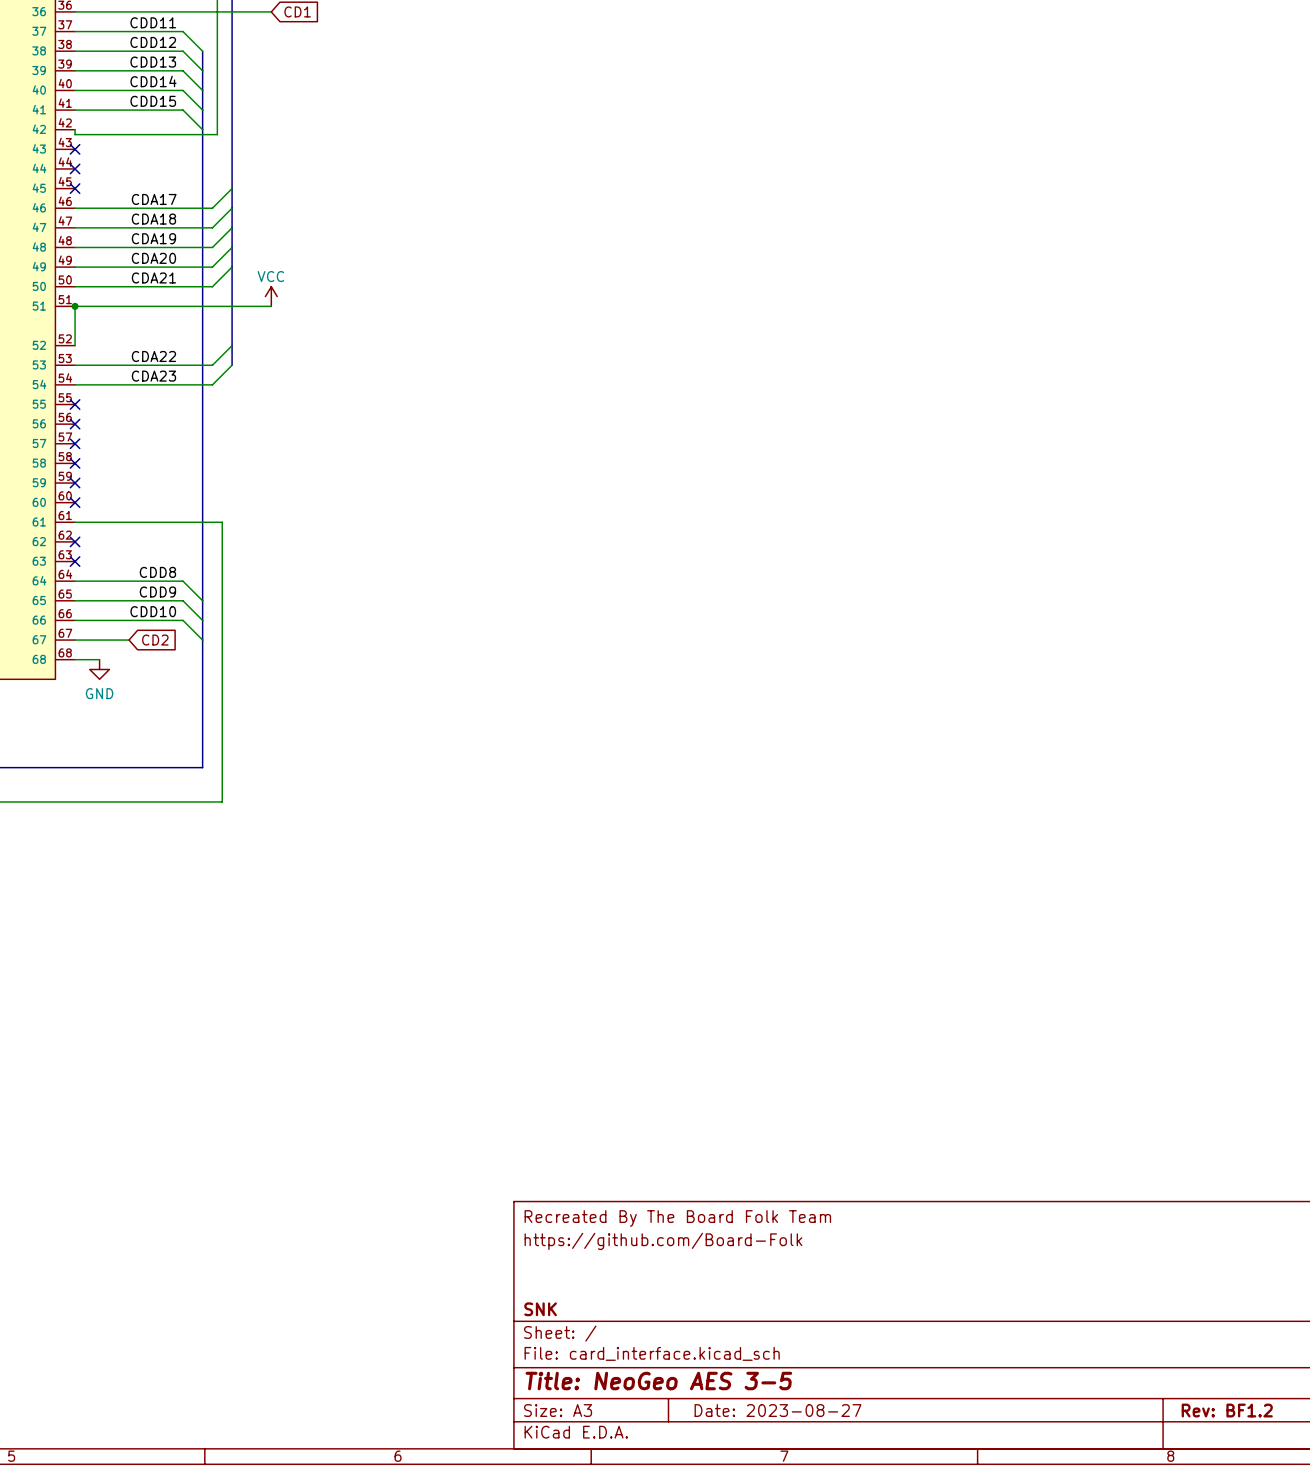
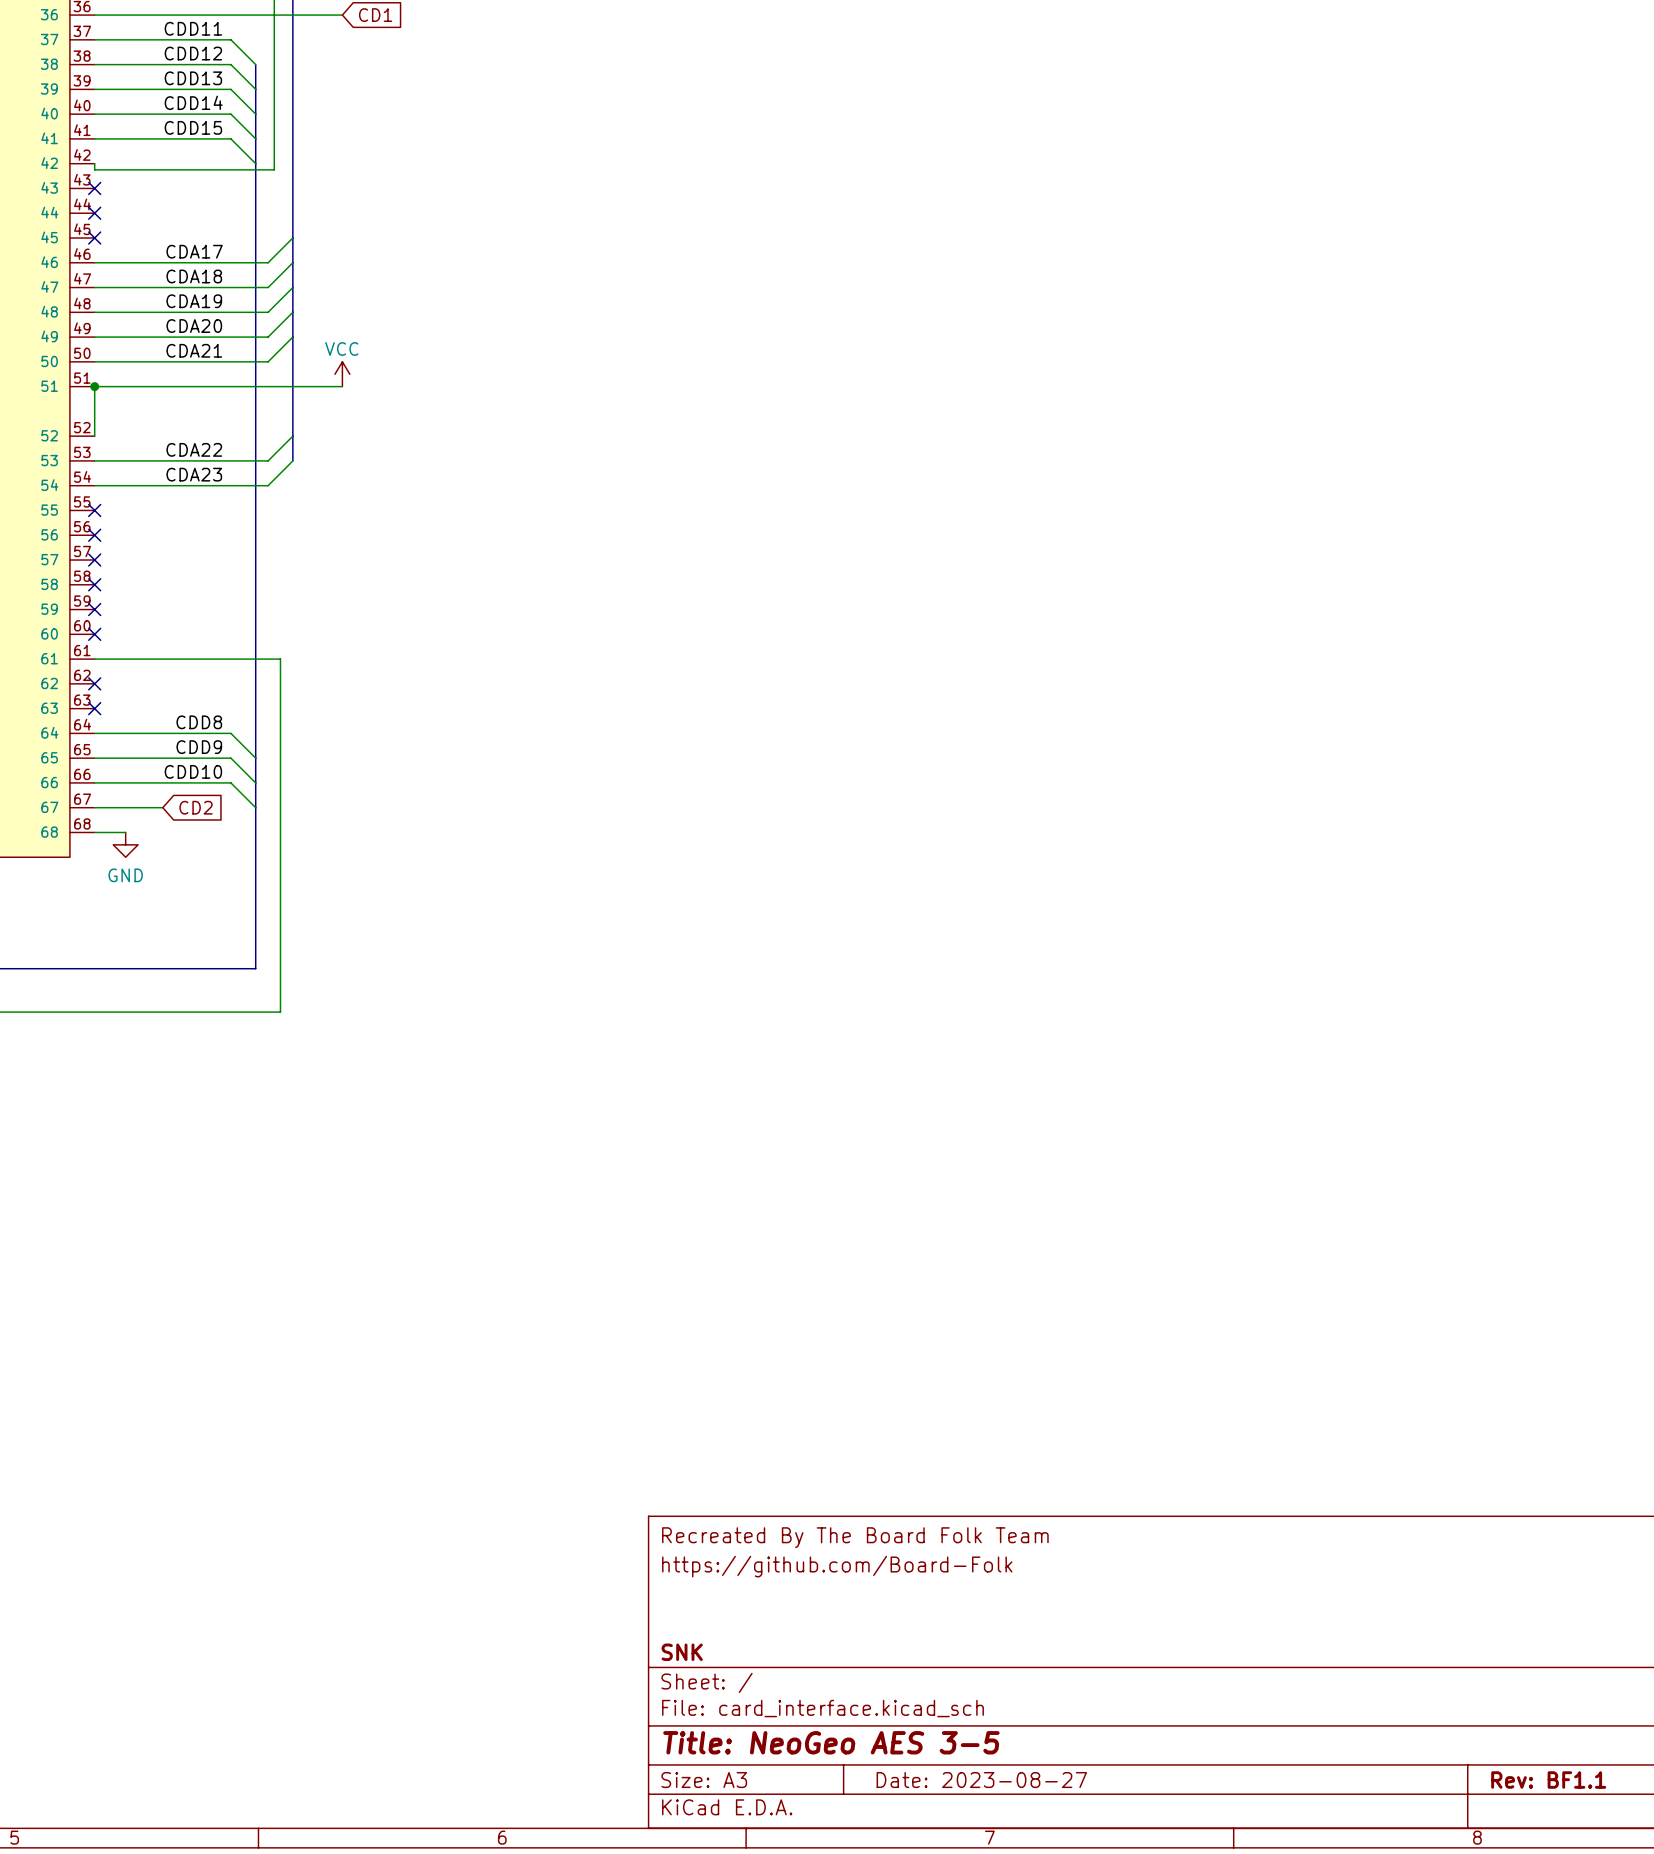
title block: Rev: BF1.2 (1227, 1410) -> Rev: BF1.1 (1548, 1780)

